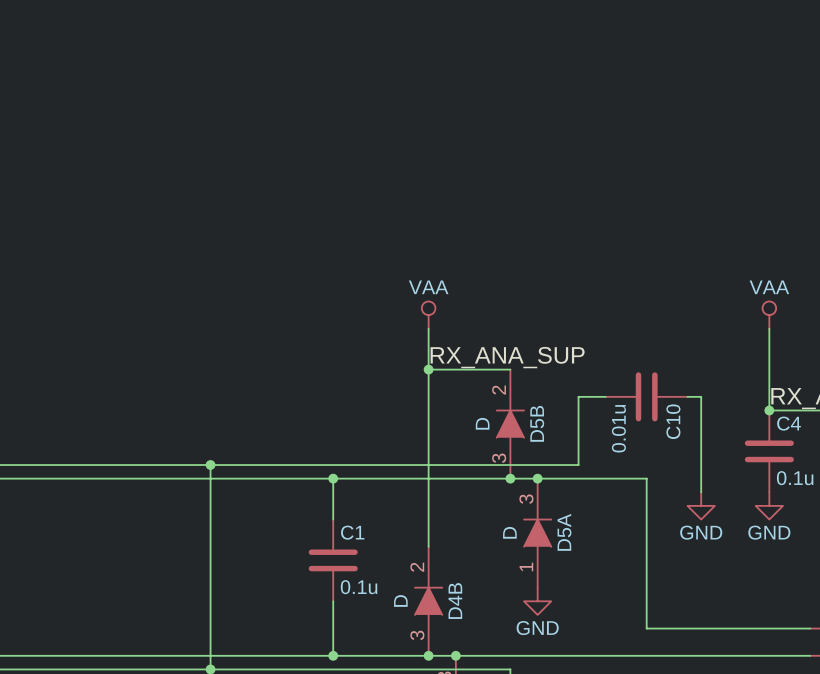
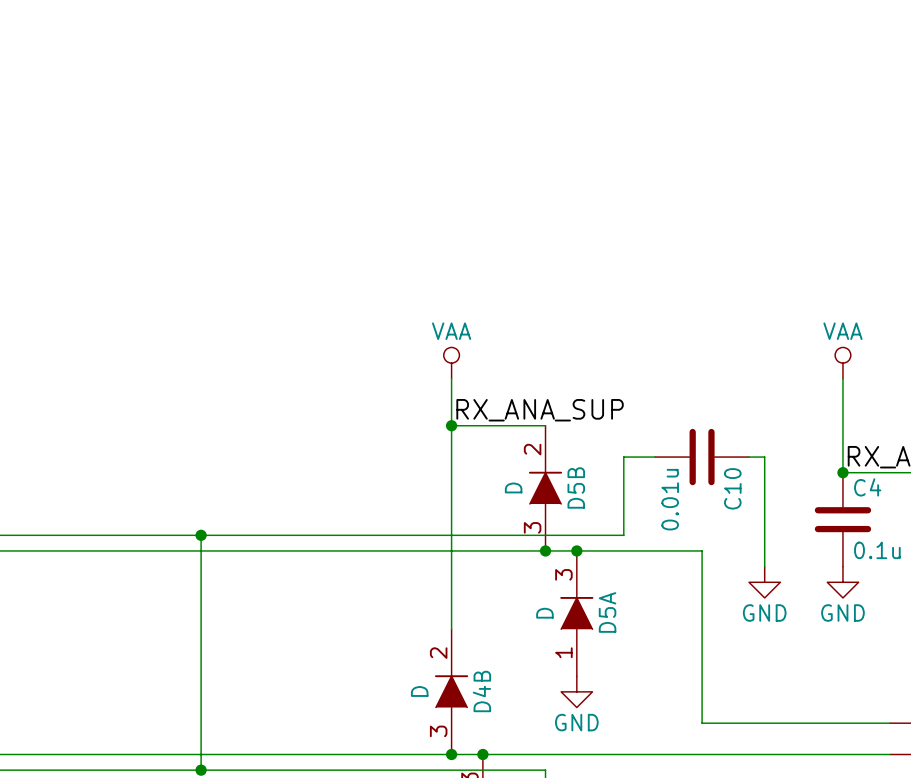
wire: (333, 478) (333, 519) -> none
junction: (333, 478) -> none
C1: 0.1u (333, 560) -> none
wire: (333, 601) (333, 655) -> none
junction: (333, 655) -> none

